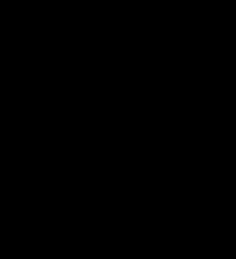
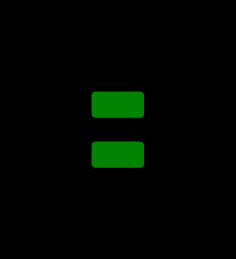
part: none -> (117, 104)
part: none -> (117, 154)

